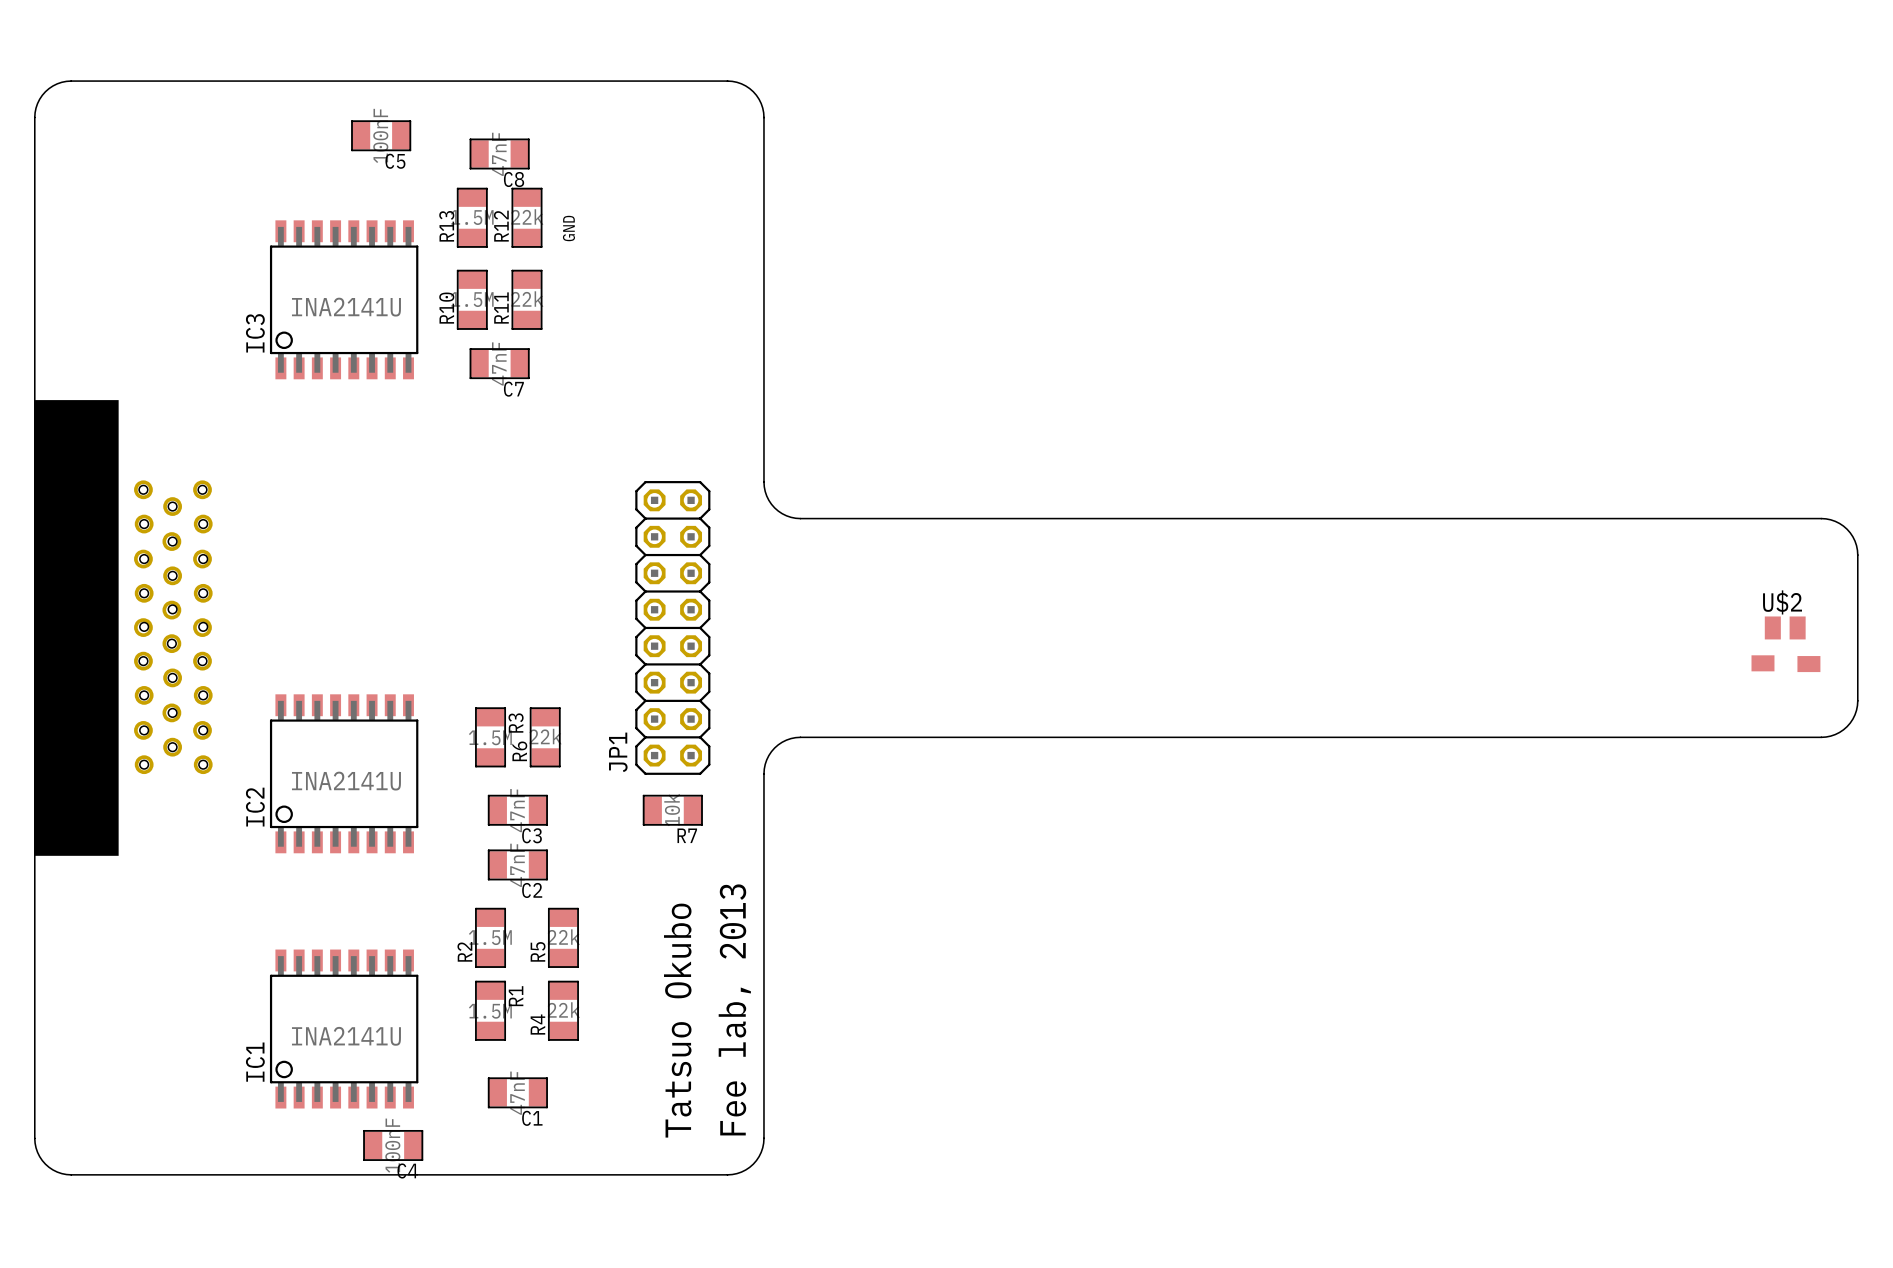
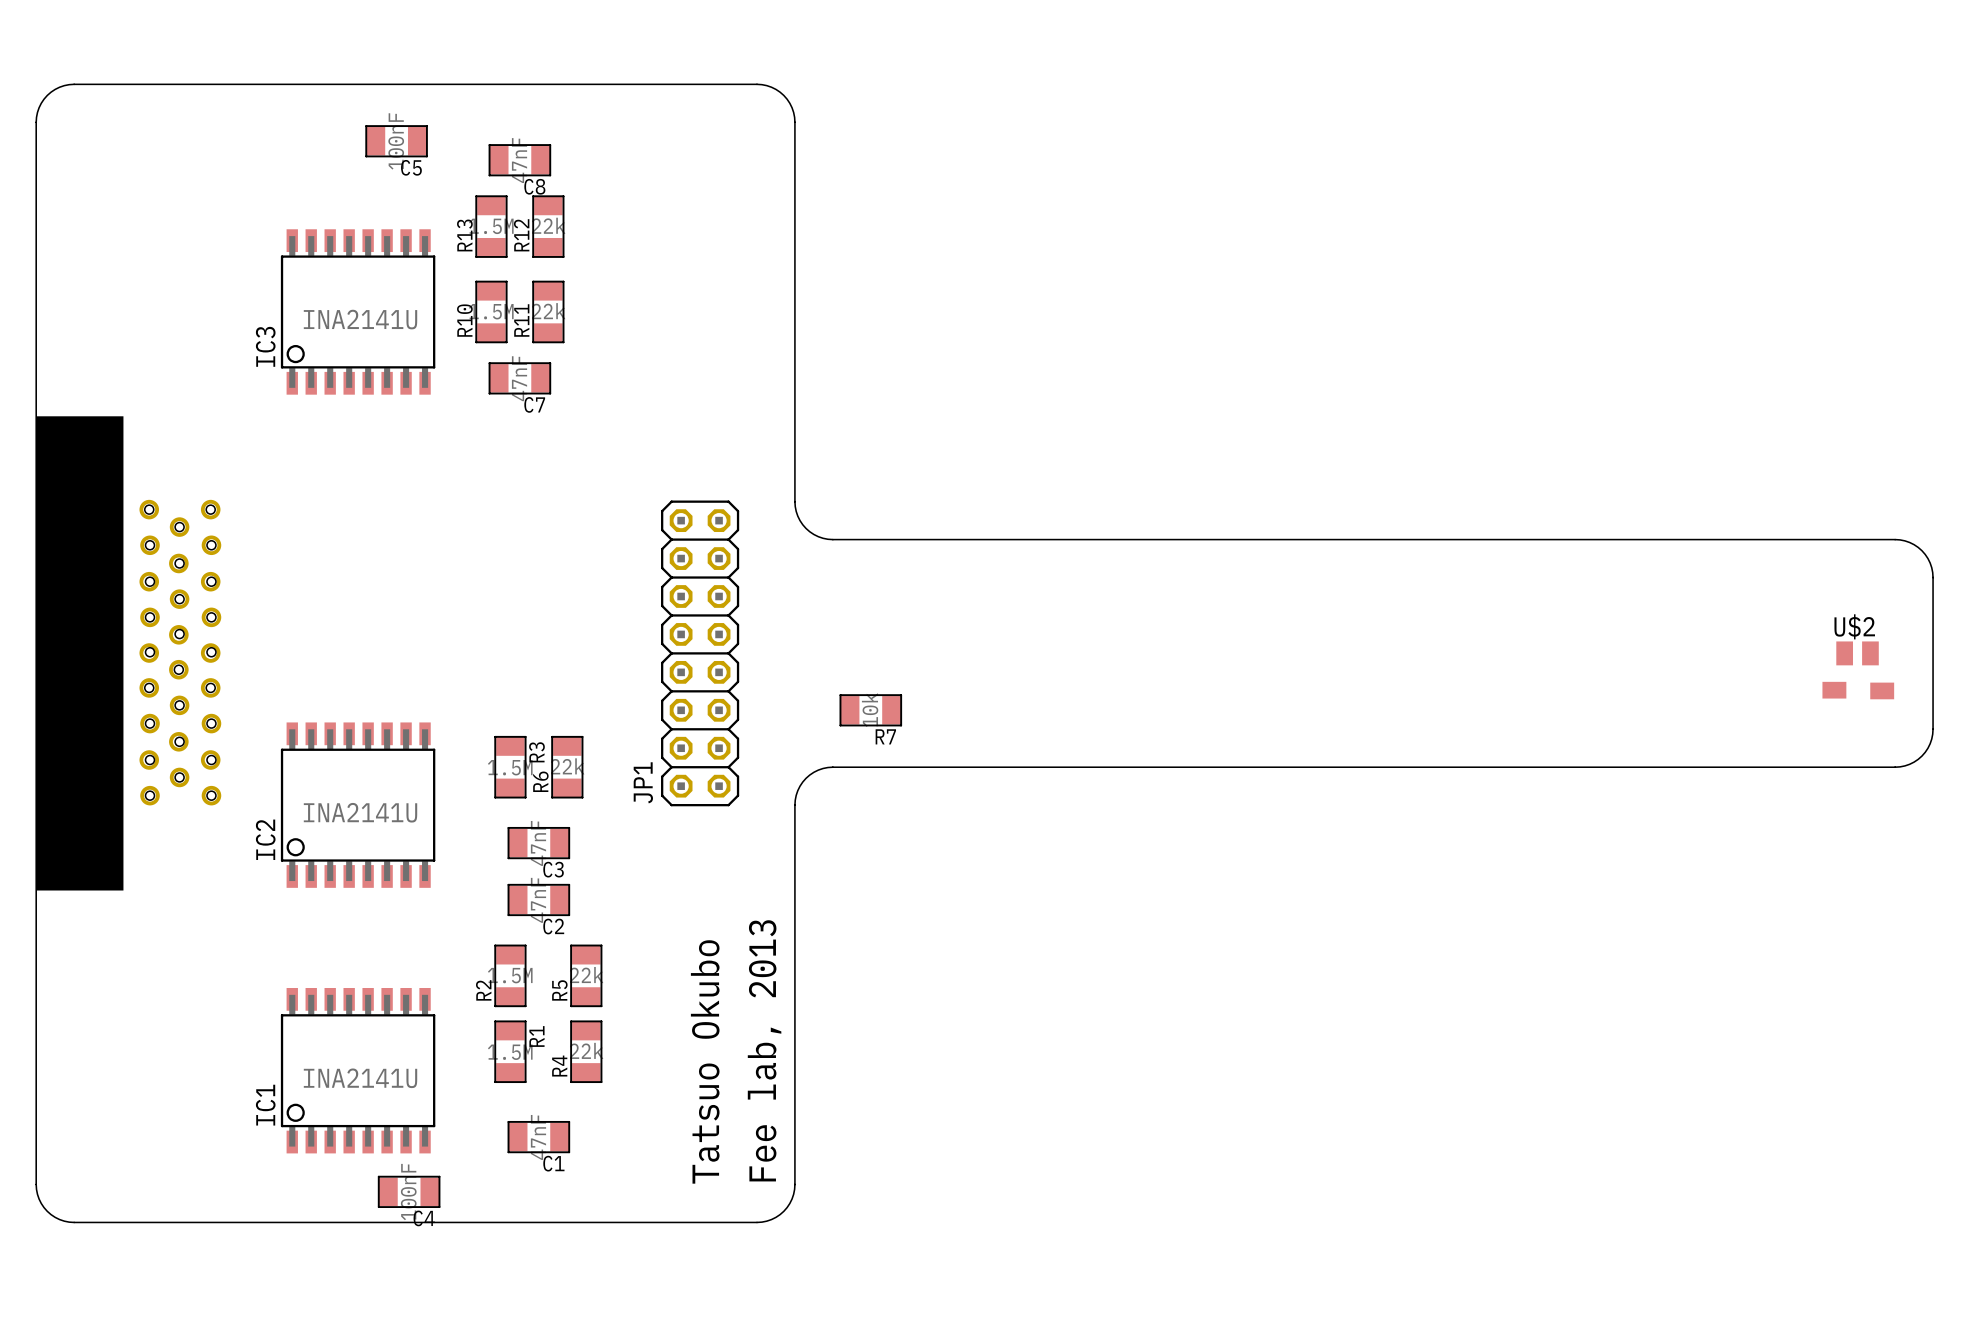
text: GND (568, 228) -> none
R7 position: (672, 810) -> (870, 710)

